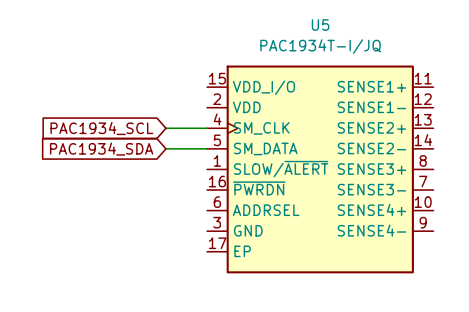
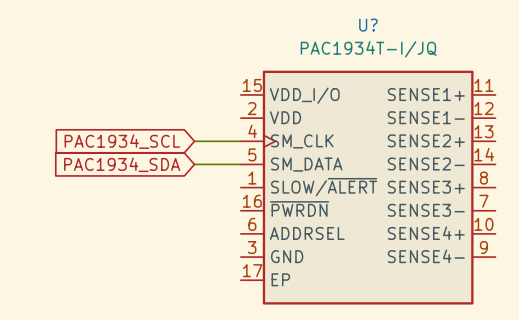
U5 name: U5 (320, 25) -> U? (368, 25)

